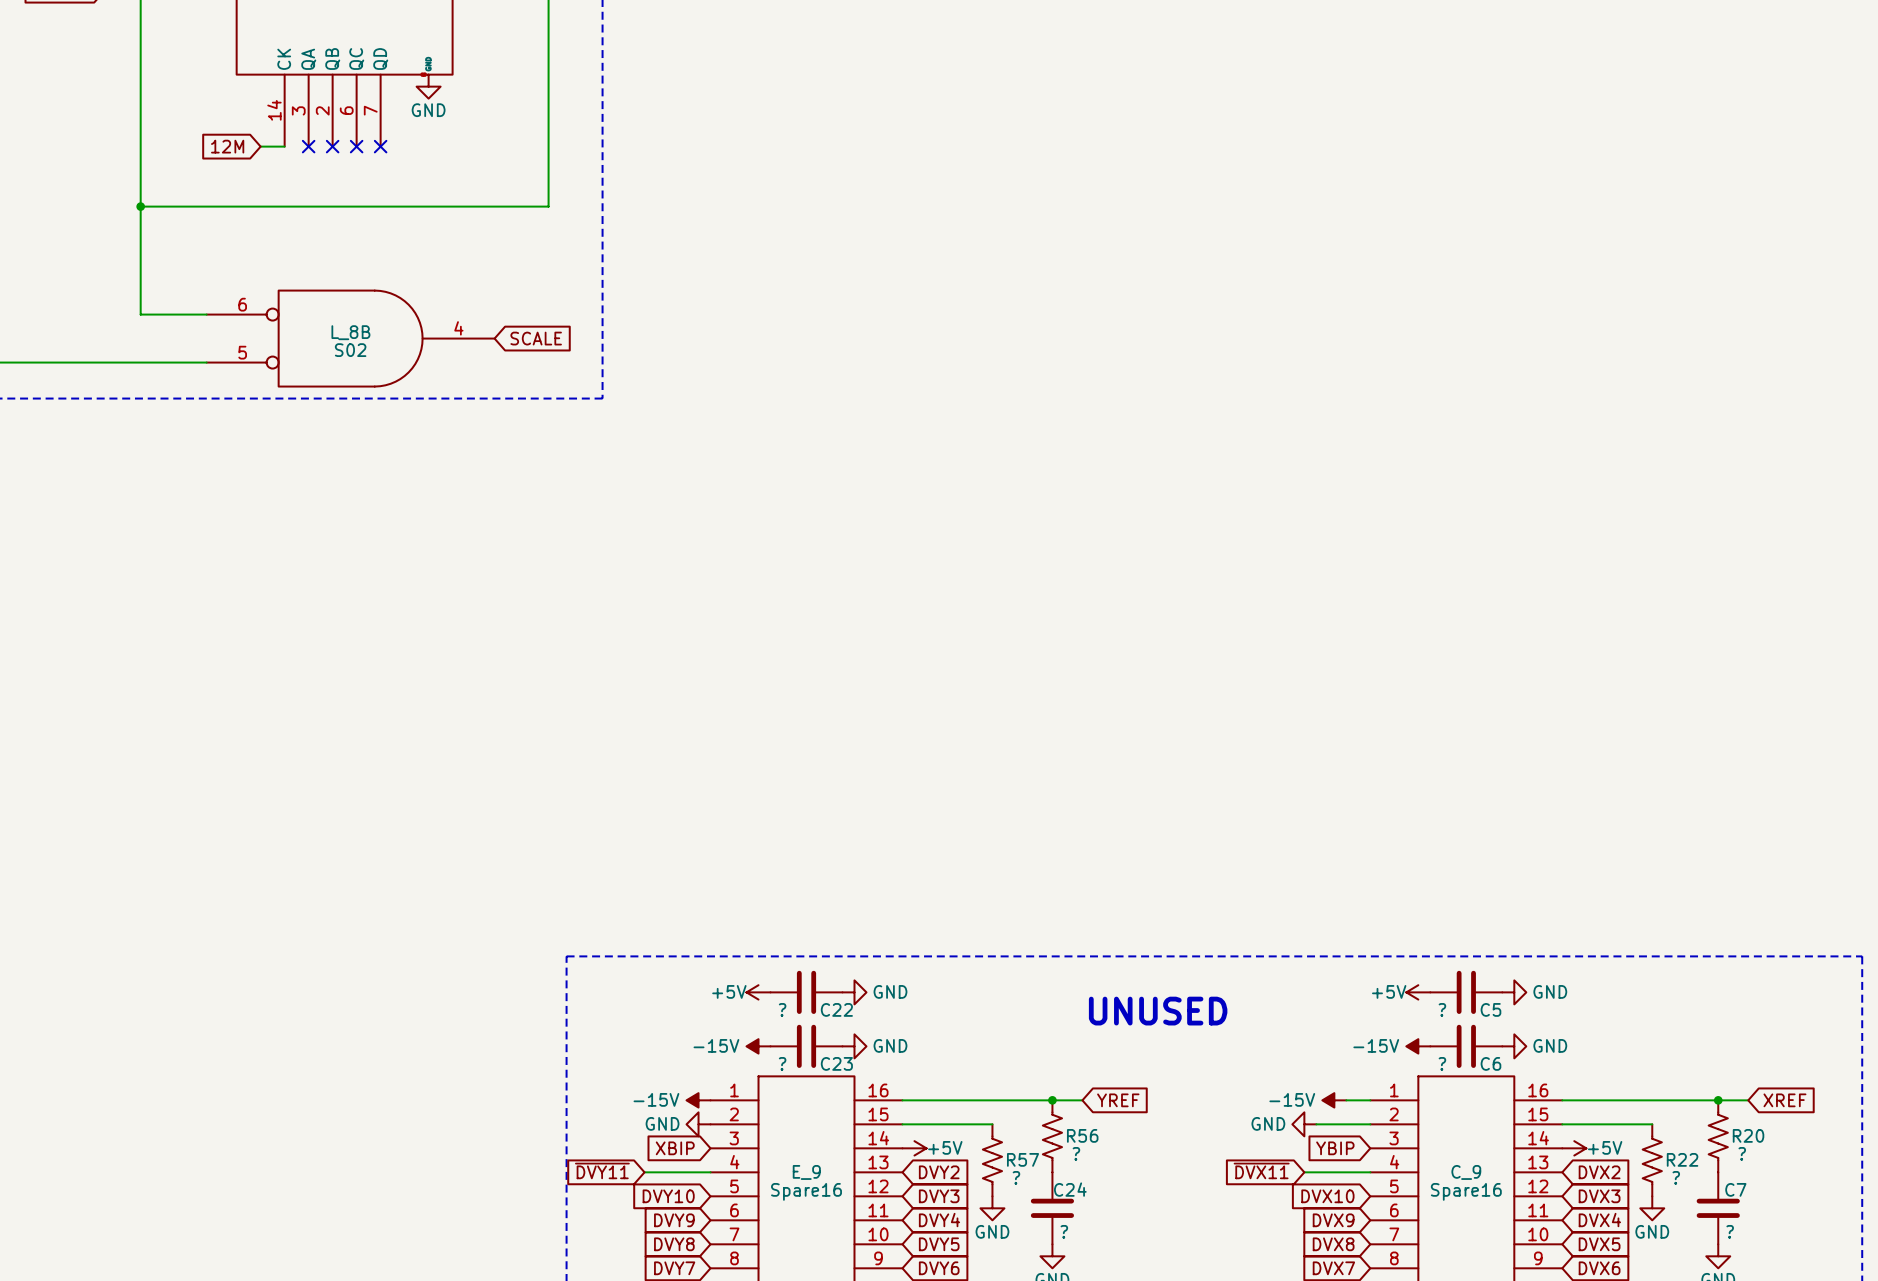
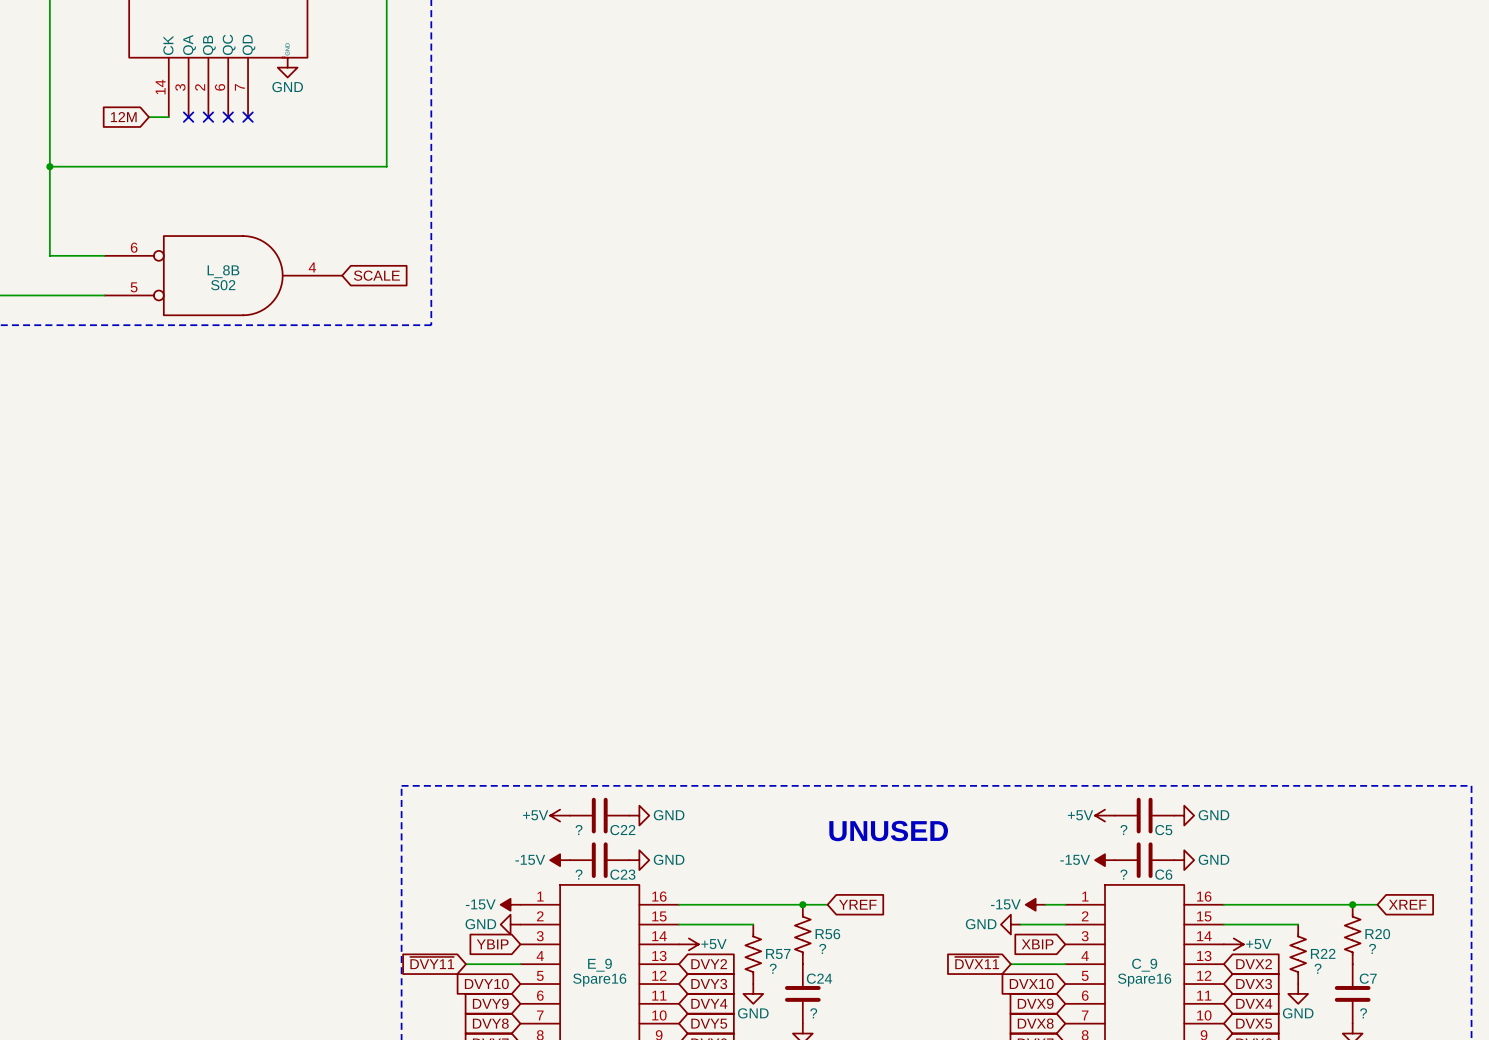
global label: XBIP (675, 1148) -> YBIP (492, 944)
global label: YBIP (1335, 1148) -> XBIP (1037, 944)

